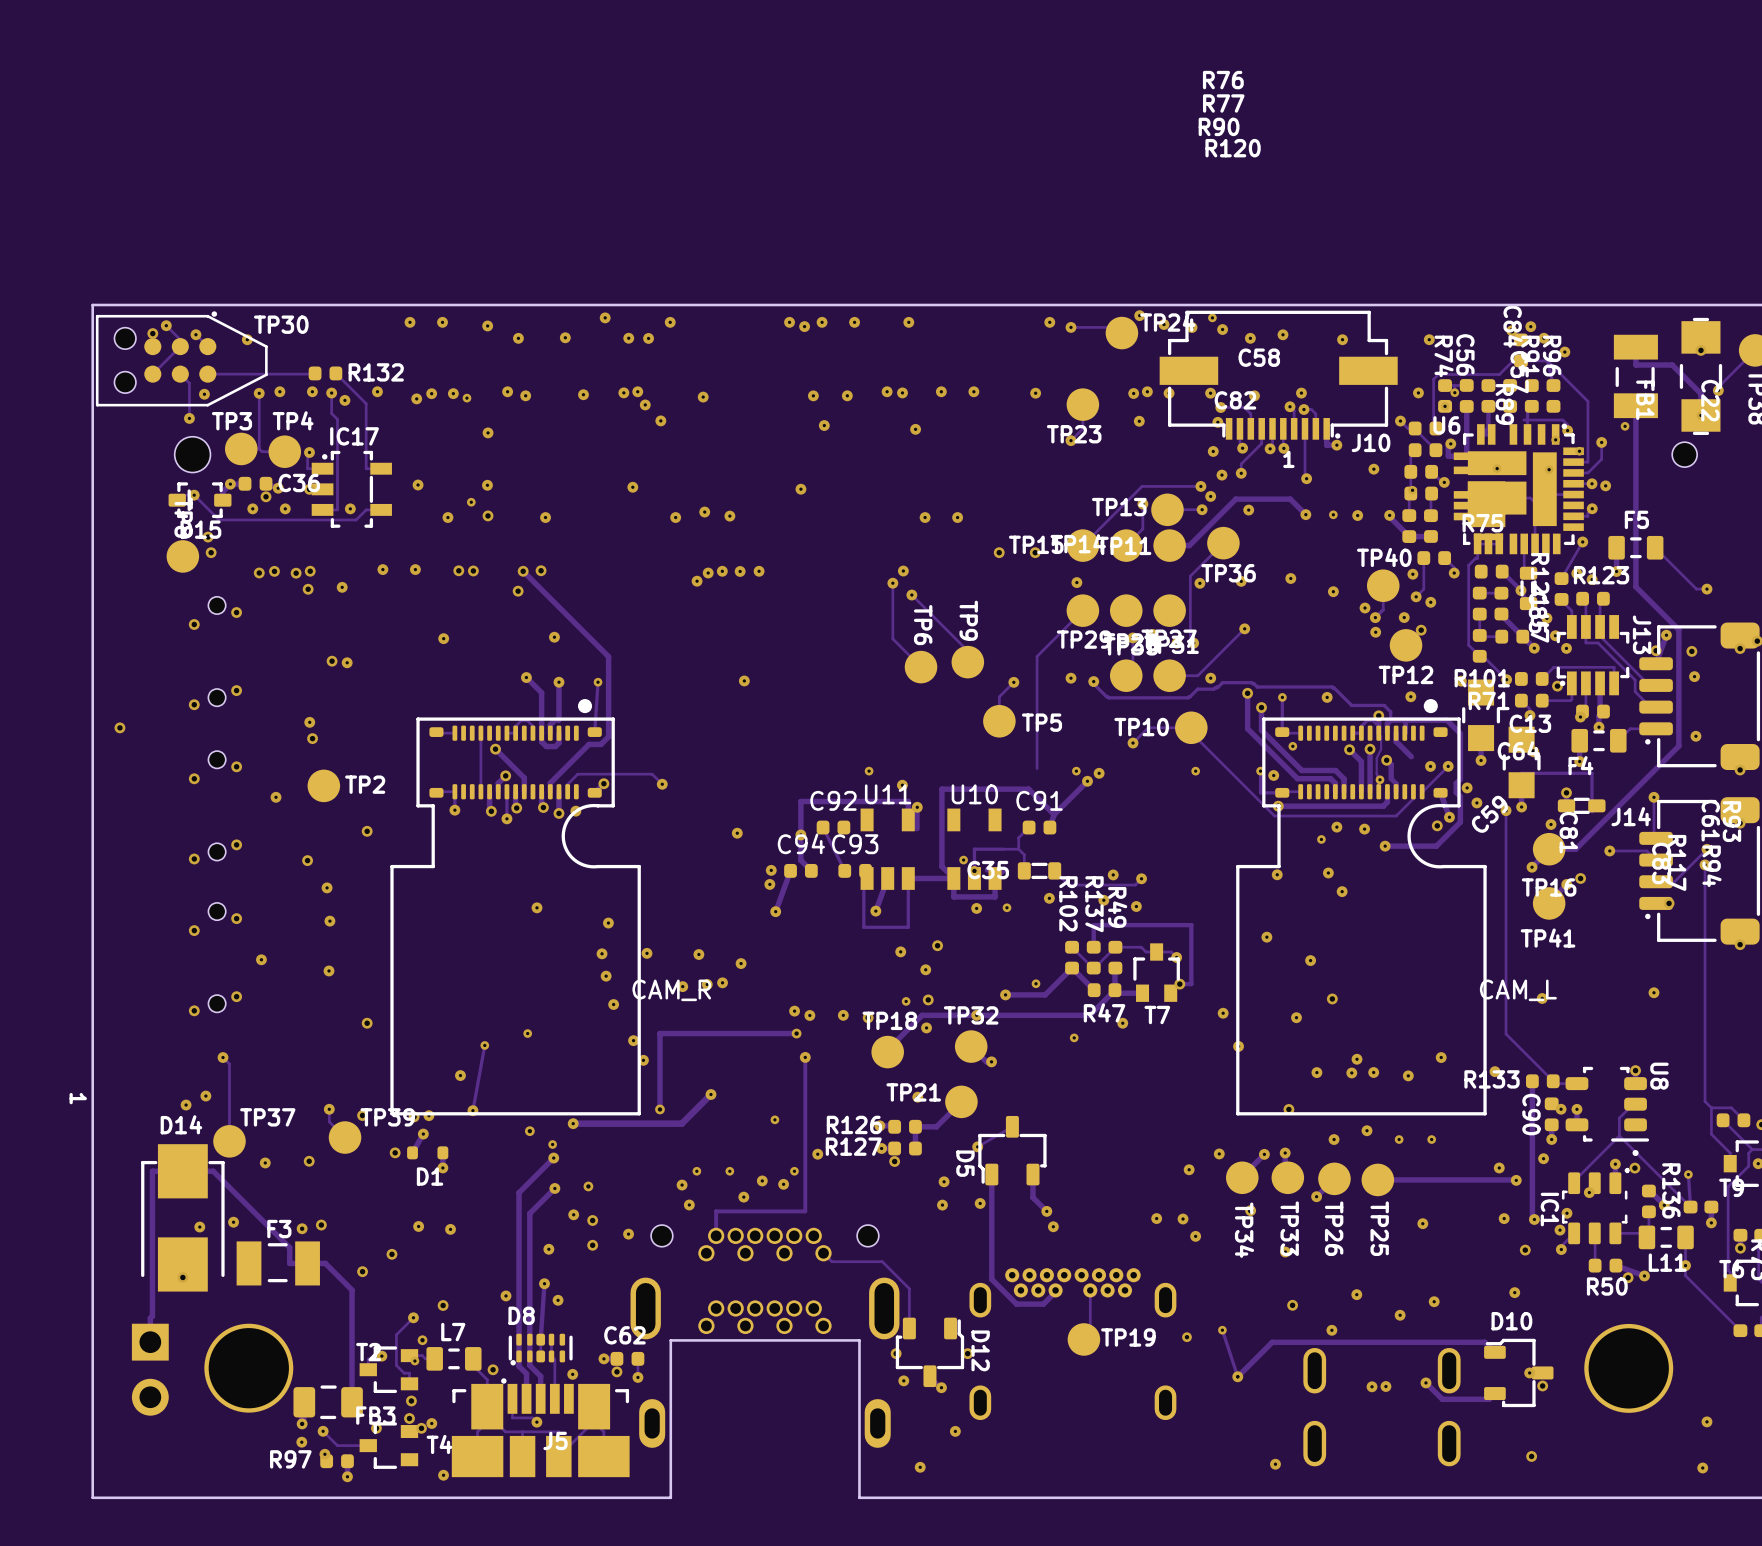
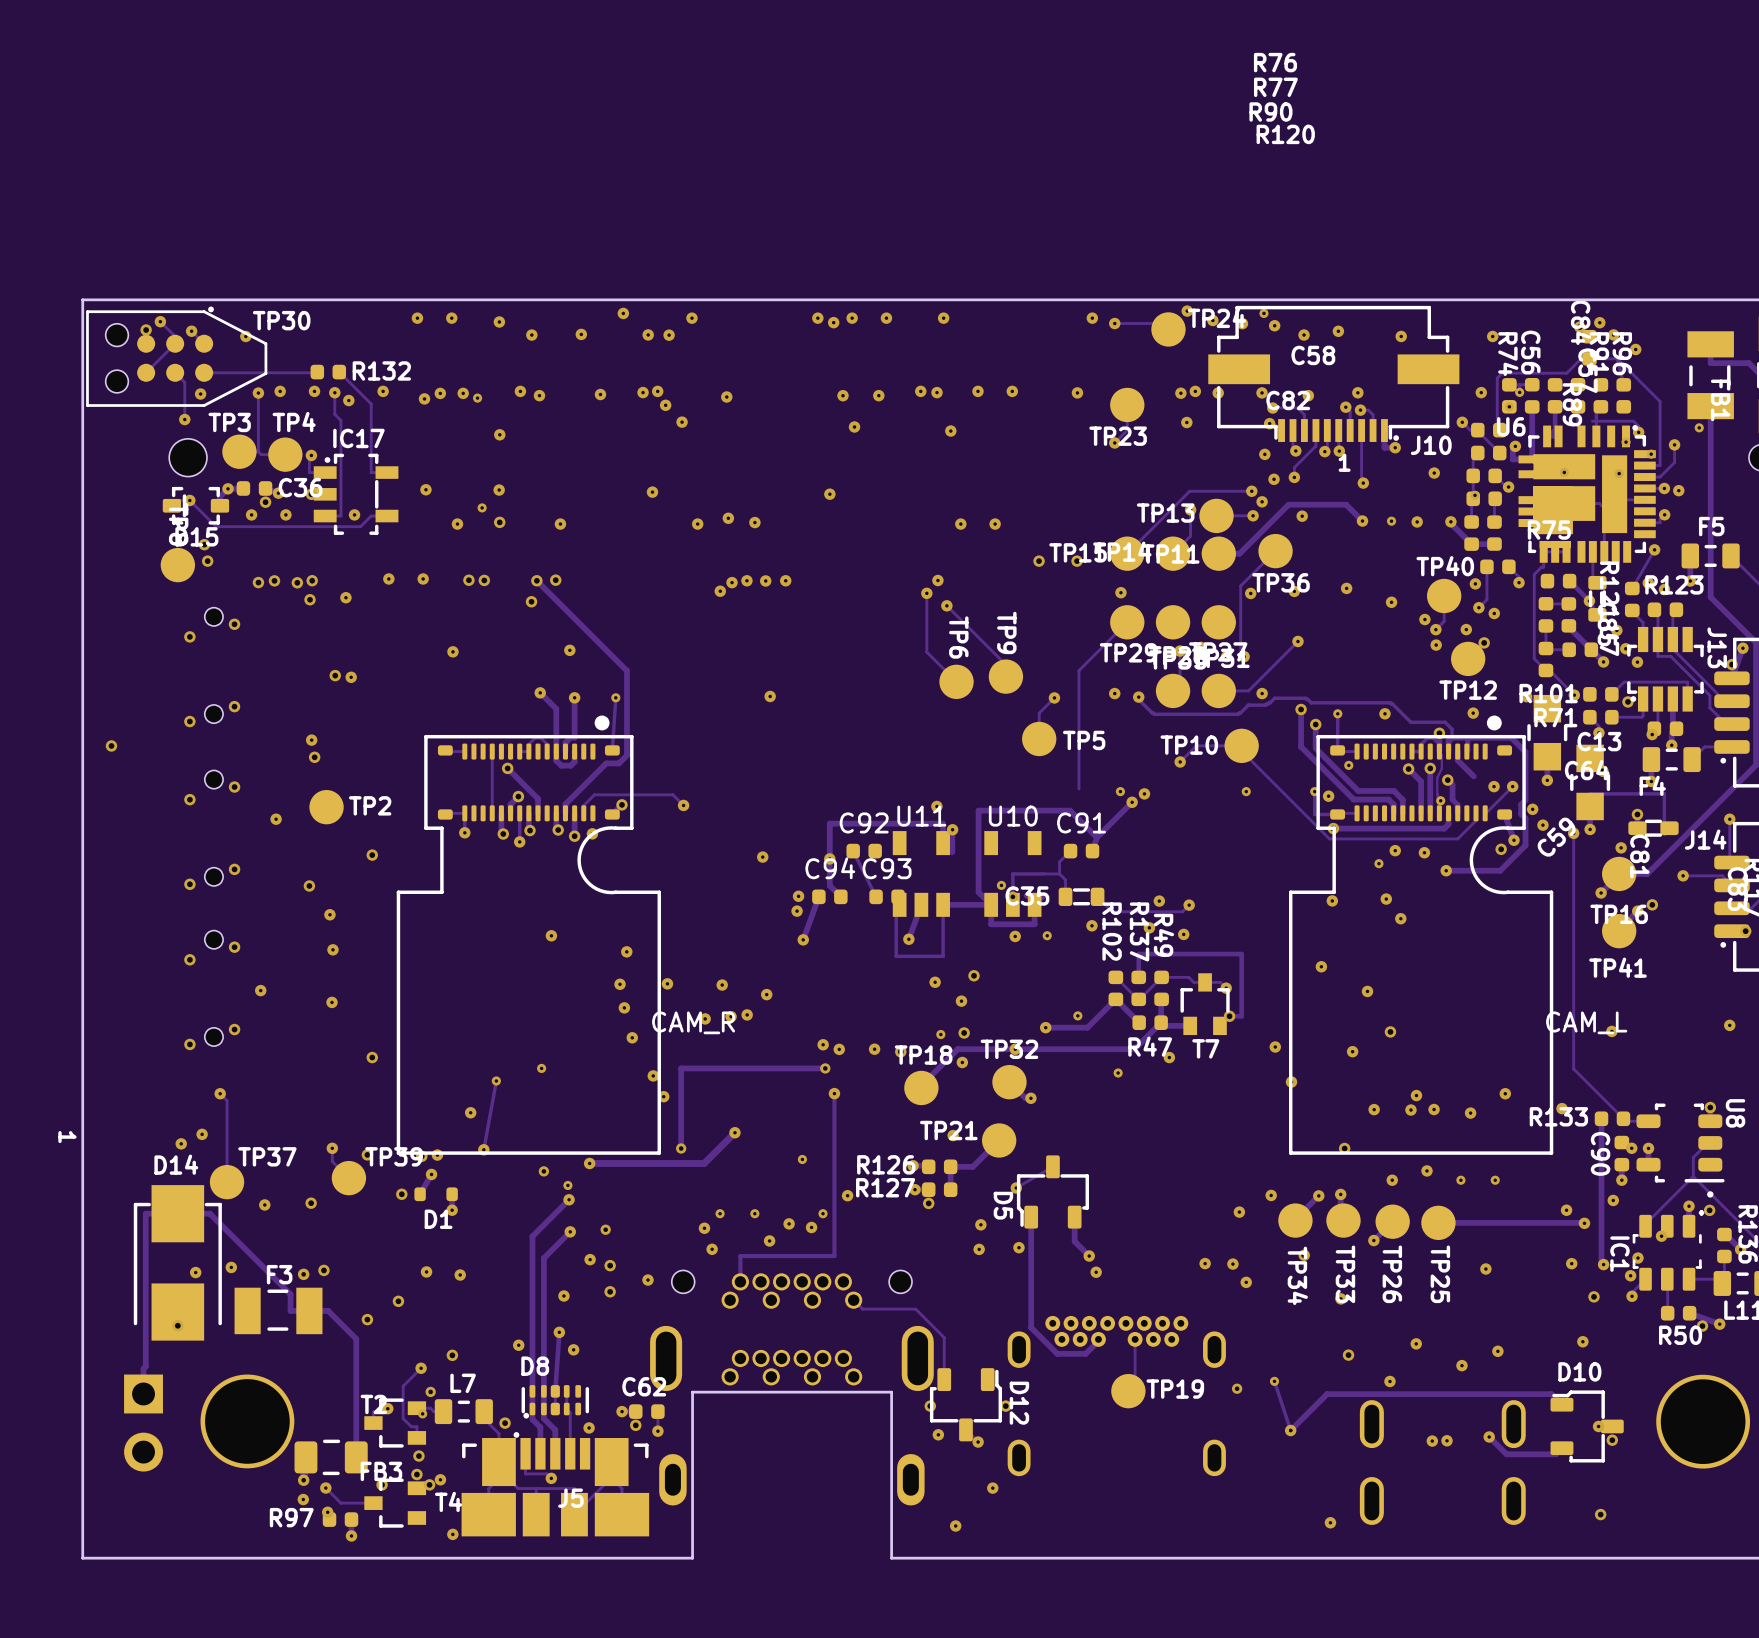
via: (869, 771) -> none

